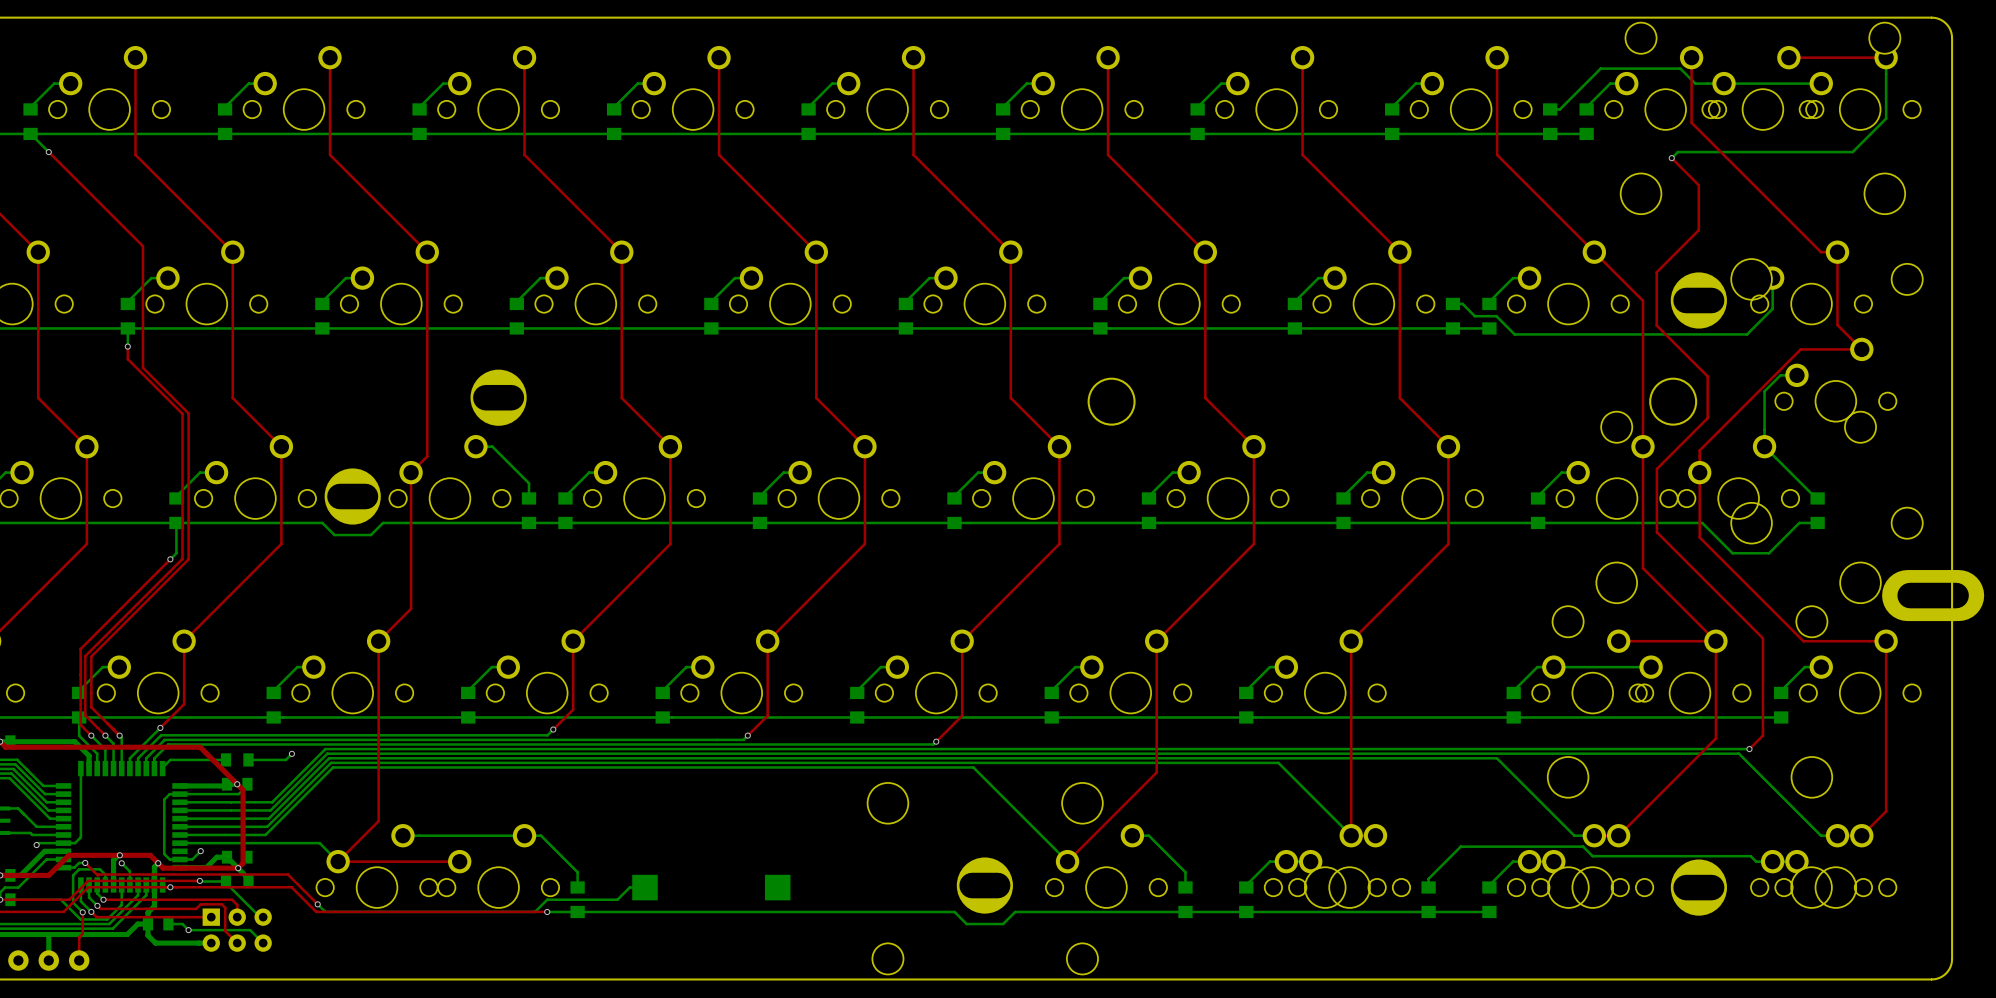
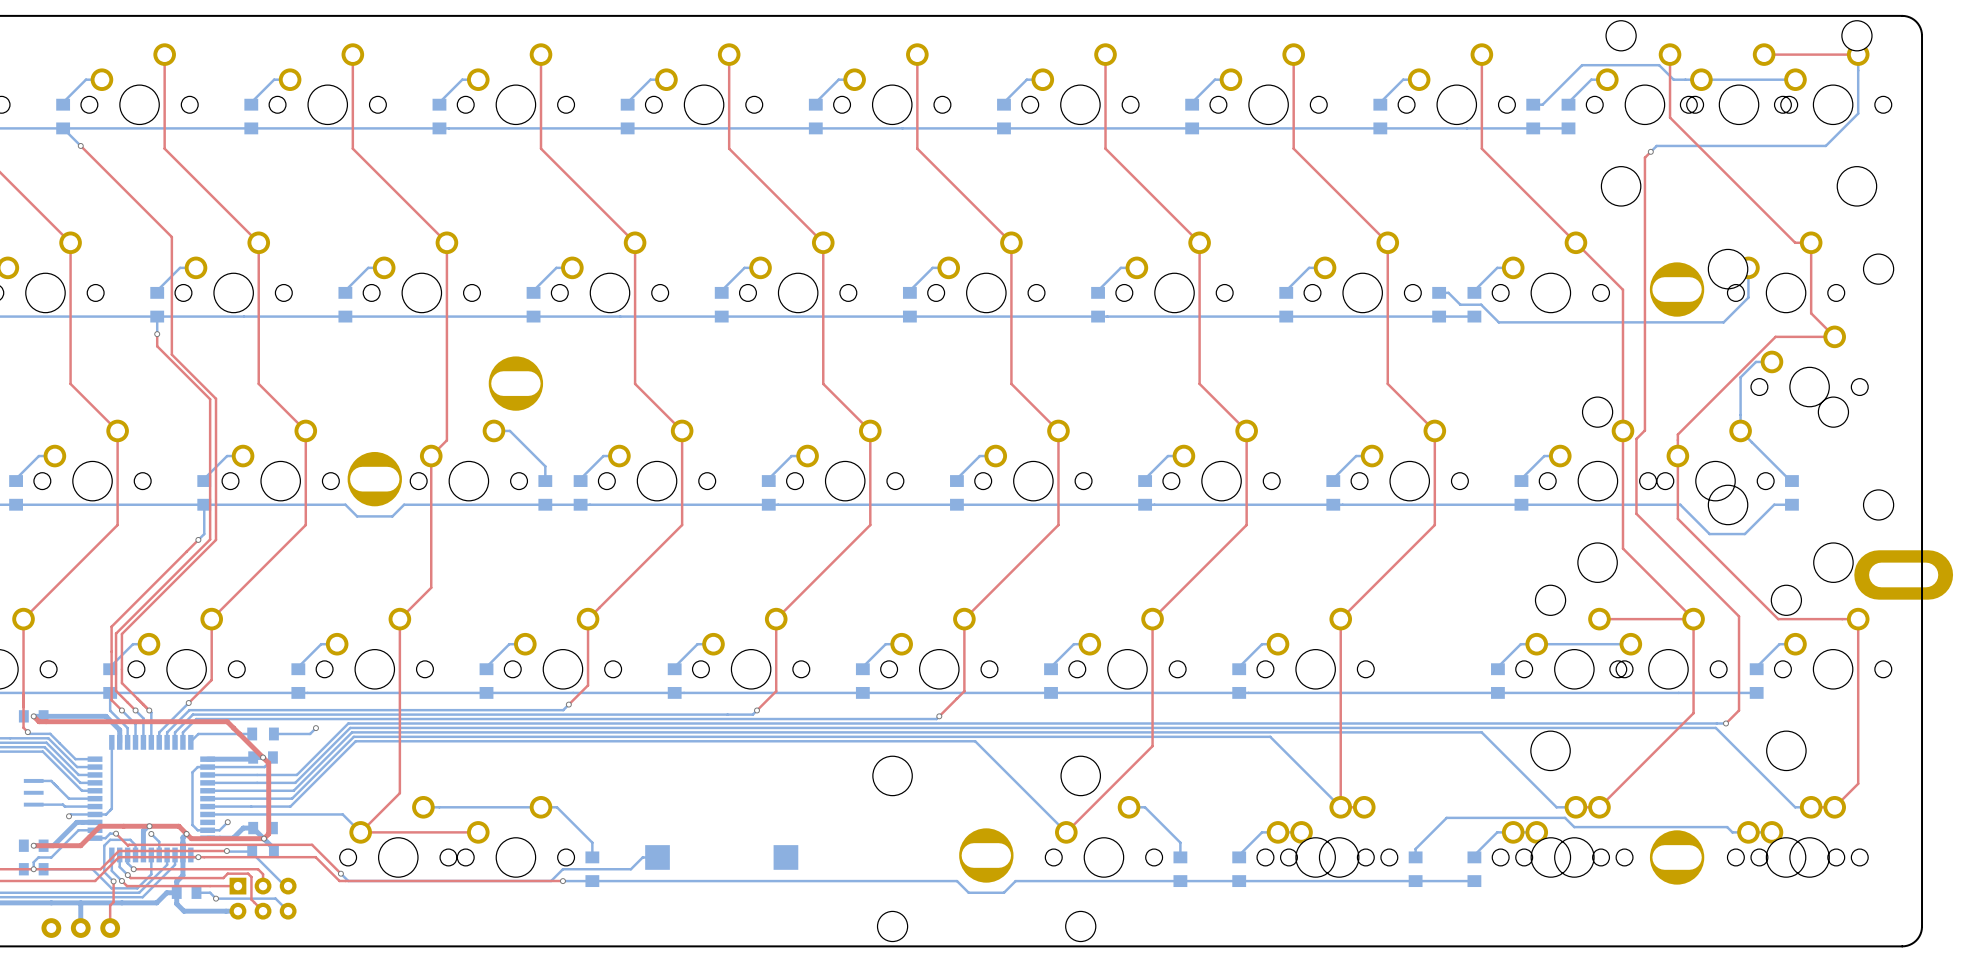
top track: (1671, 158) (1698, 185) (1698, 230) (1656, 272) (1656, 325) (1707, 376) (1707, 418) (1656, 468) -> (1650, 151) (1644, 157) (1644, 430) (1636, 438) (1636, 452)
round board edge: [1087, 377, 1136, 426] -> none
round board edge: [1649, 377, 1698, 426] -> none

